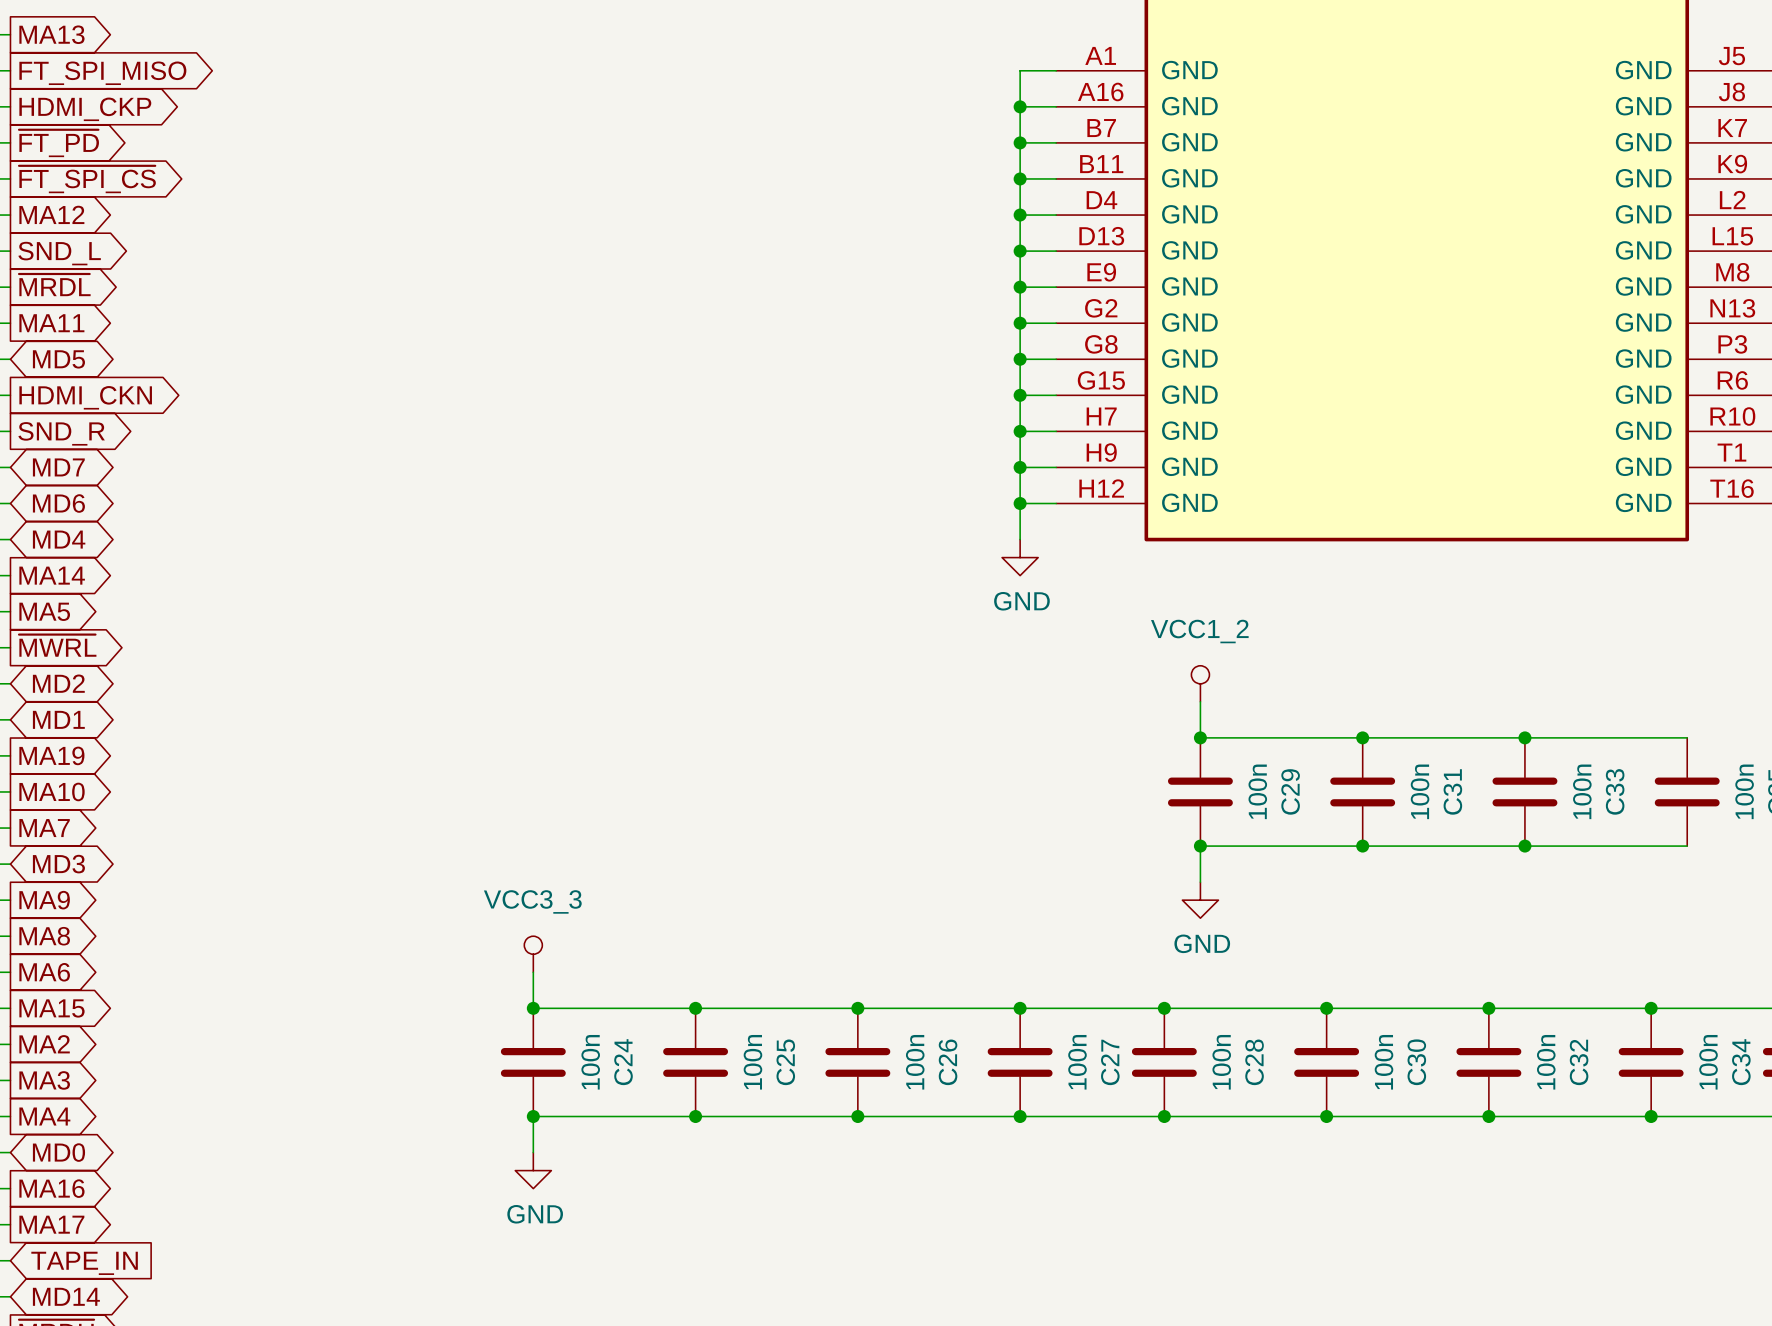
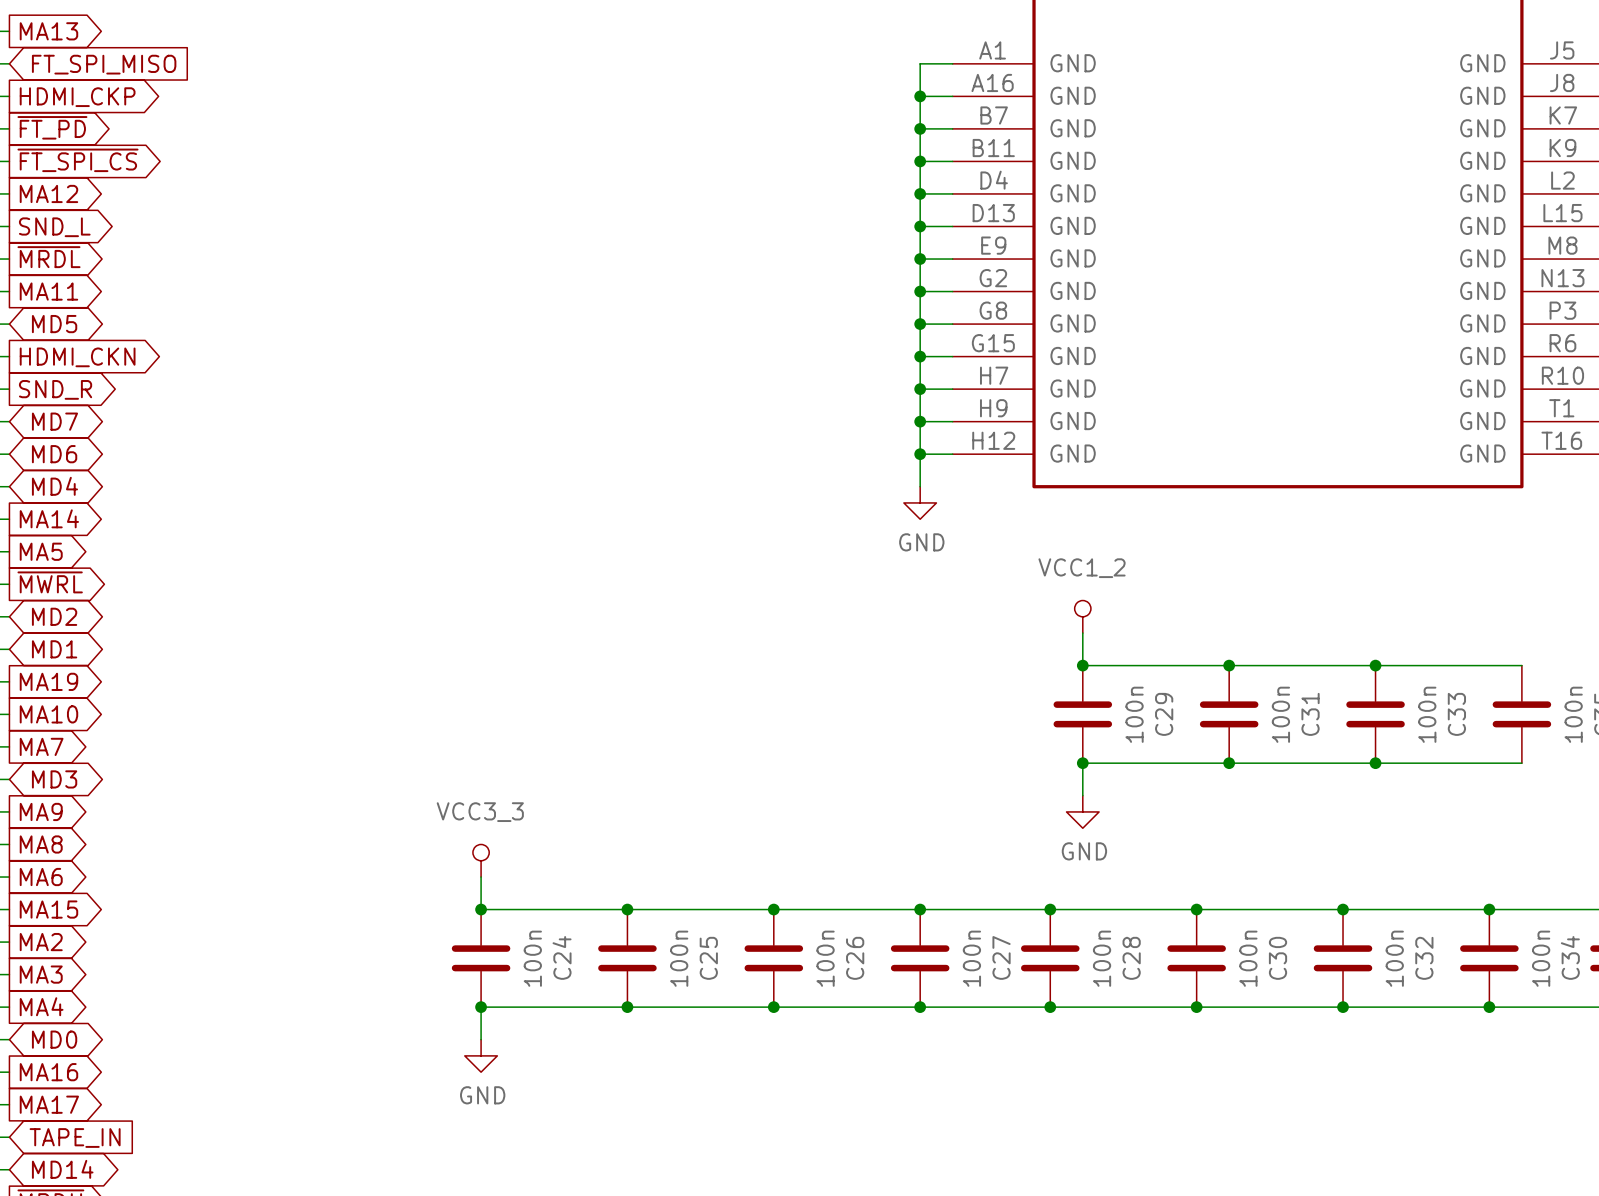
global label shape: output (102, 73) -> input (104, 64)

